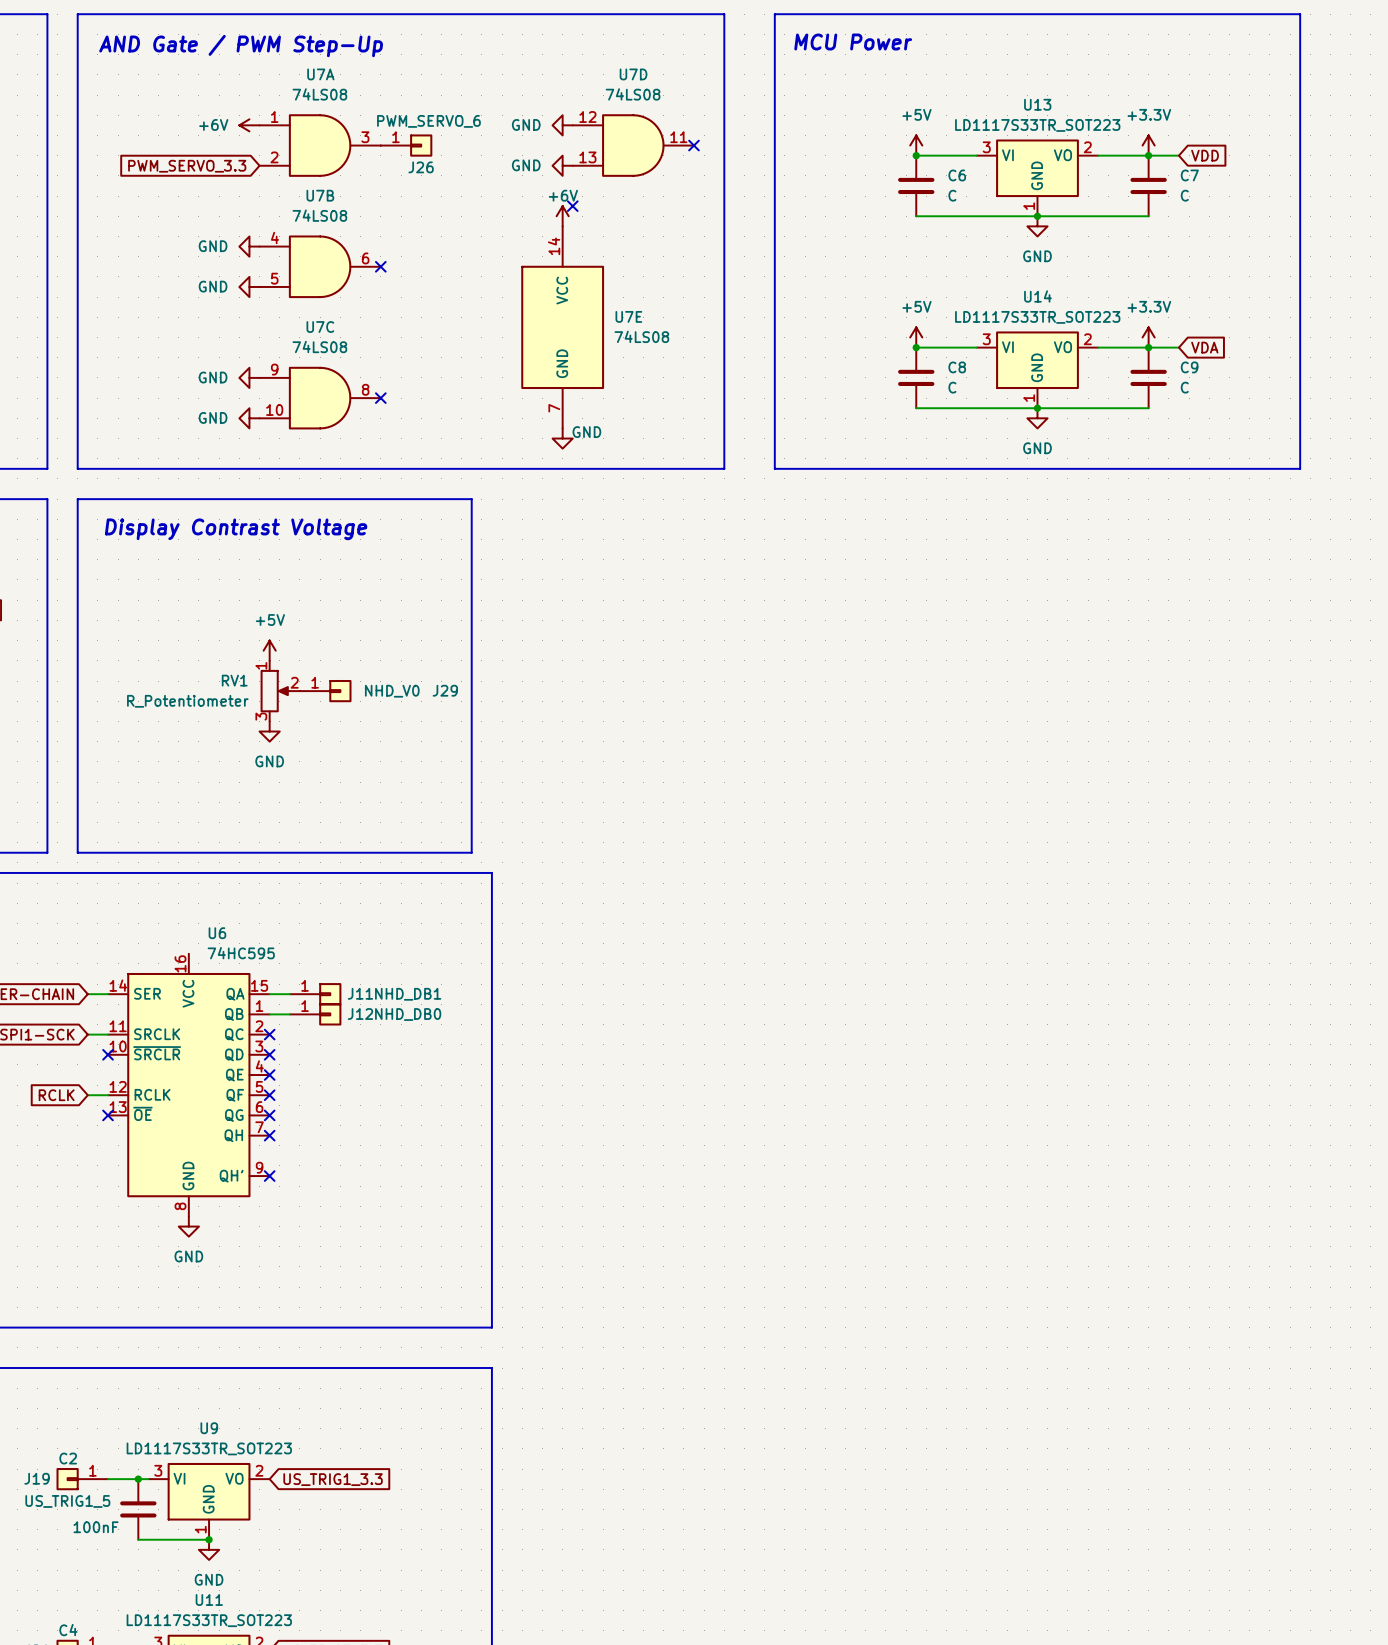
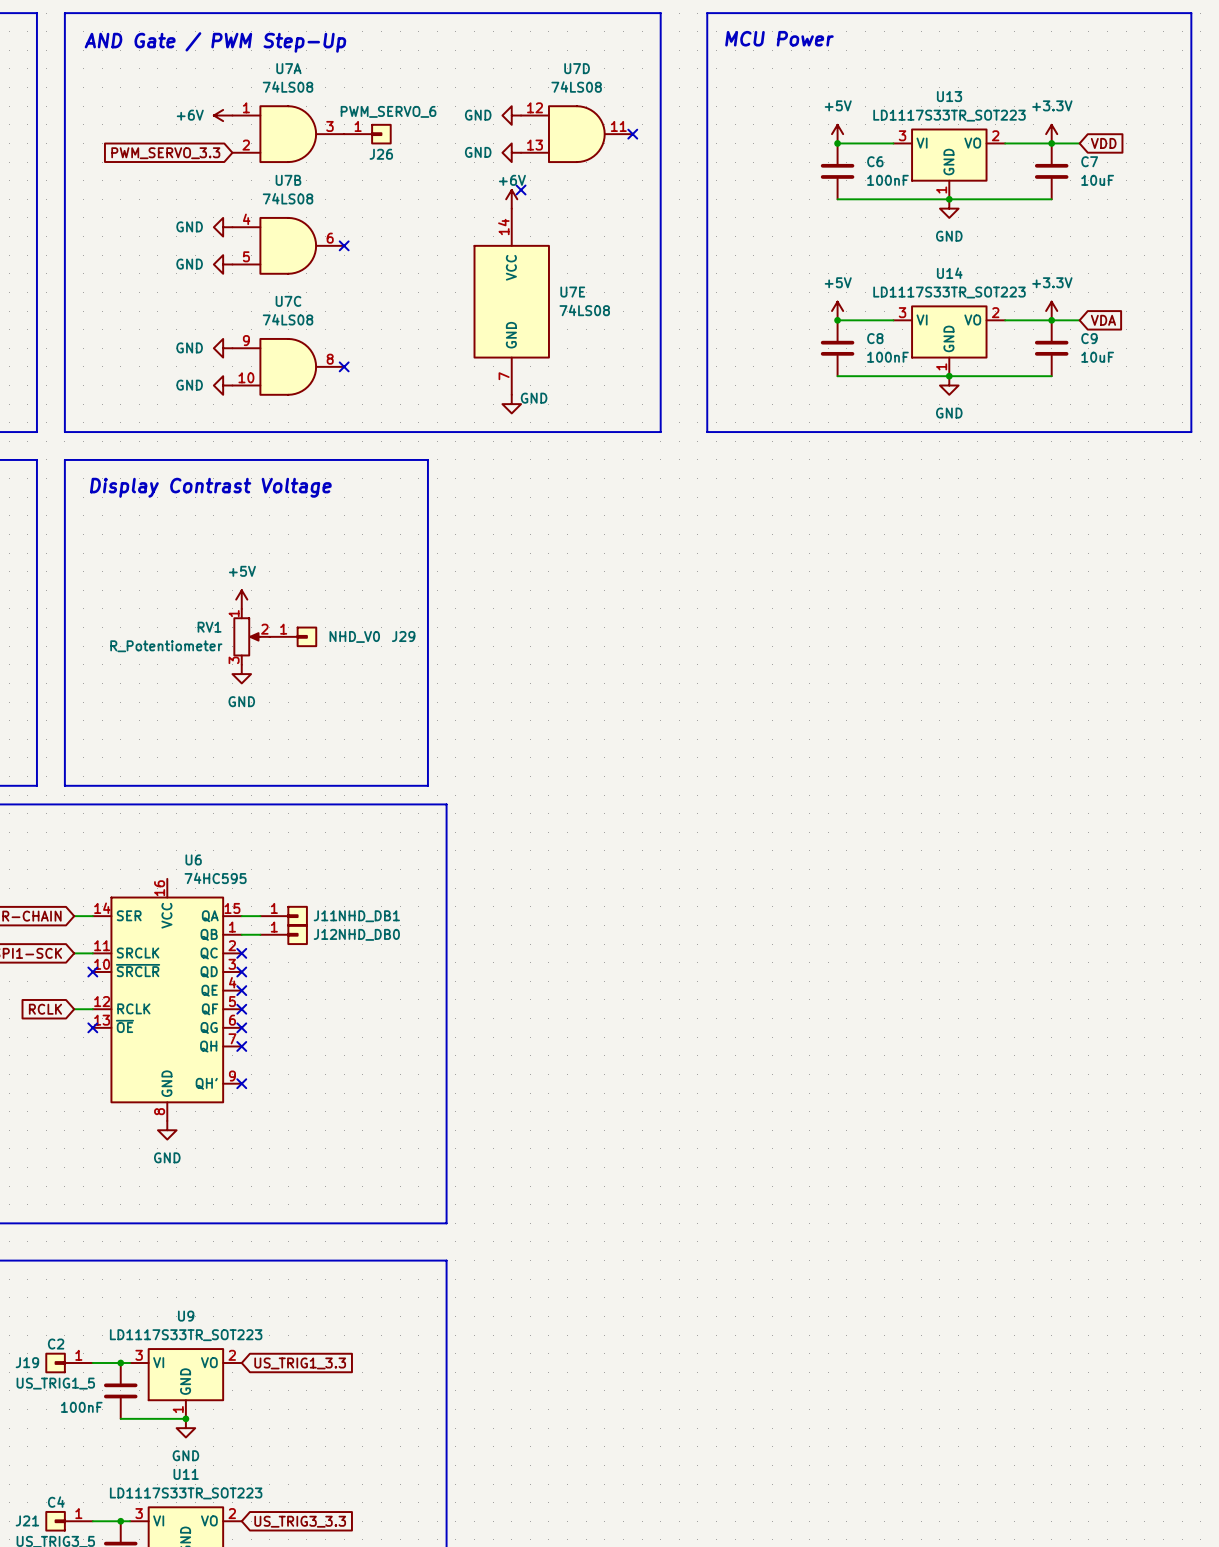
C6 value: C (952, 195) -> 100nF (887, 180)
C7 value: C (1184, 195) -> 10uF (1097, 180)
C8 value: C (952, 387) -> 100nF (887, 357)
C9 value: C (1184, 387) -> 10uF (1097, 357)

